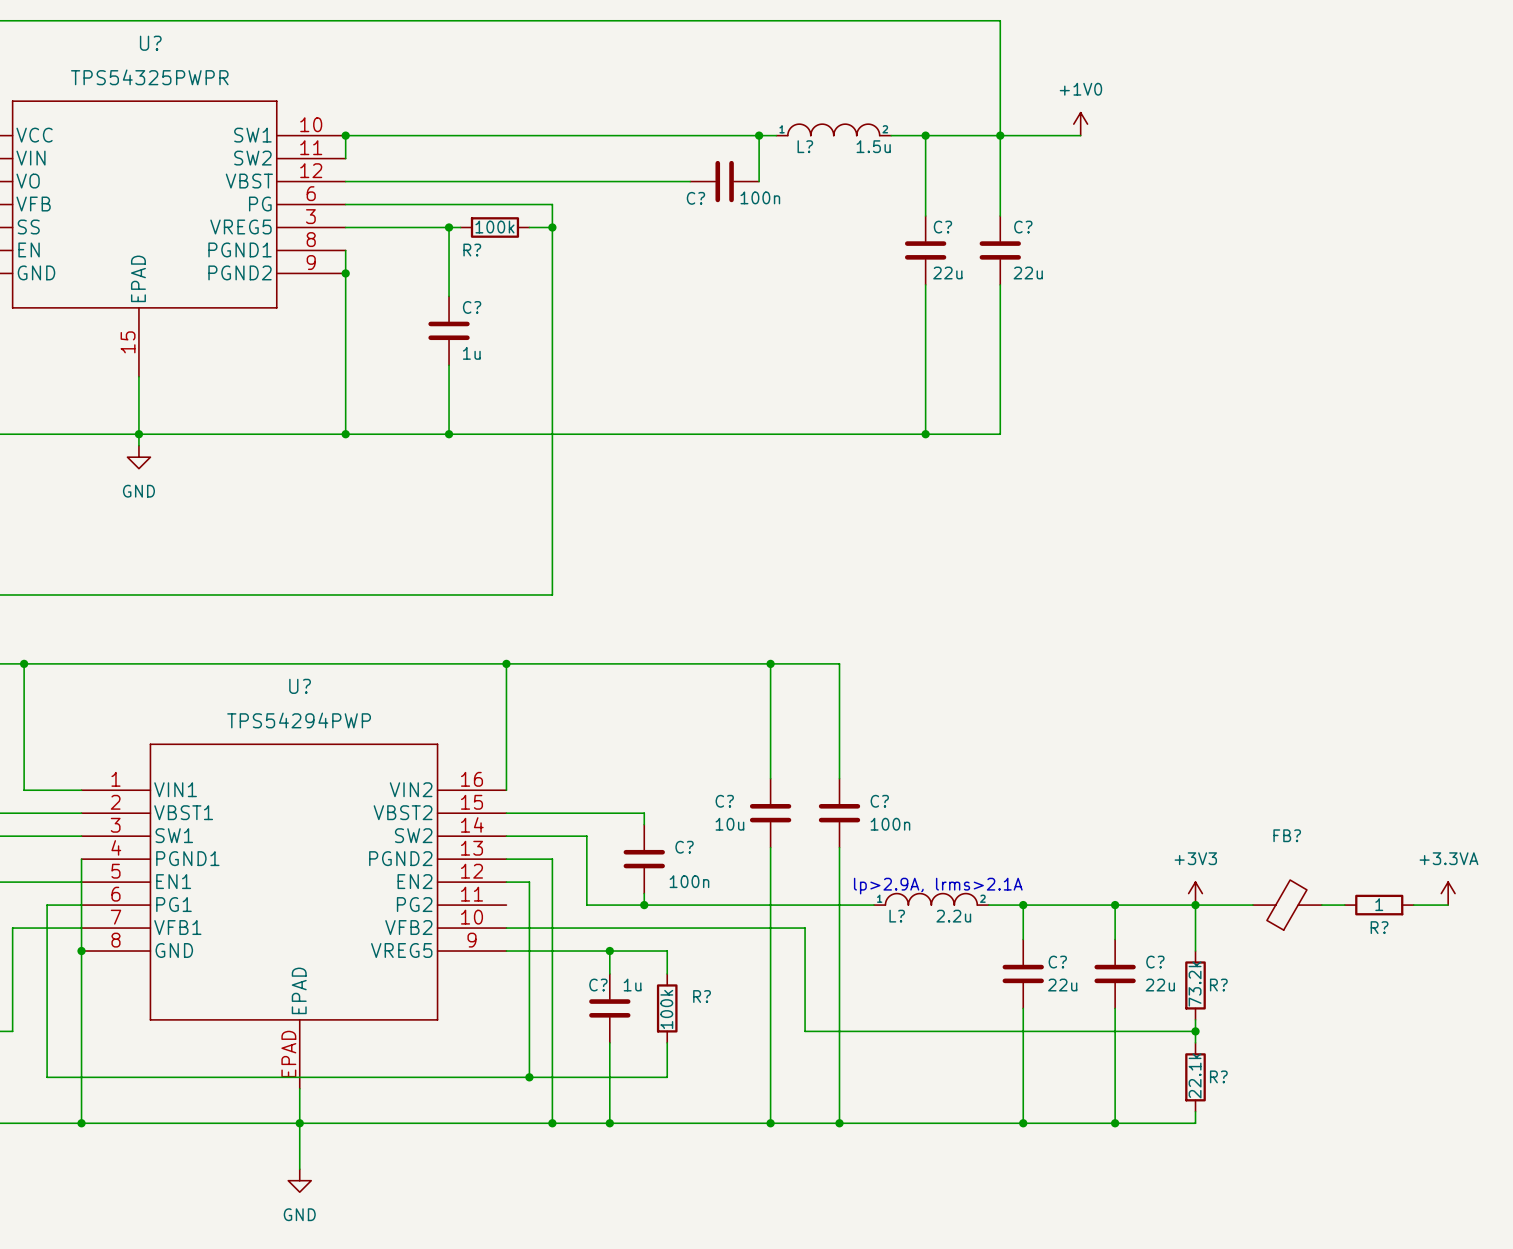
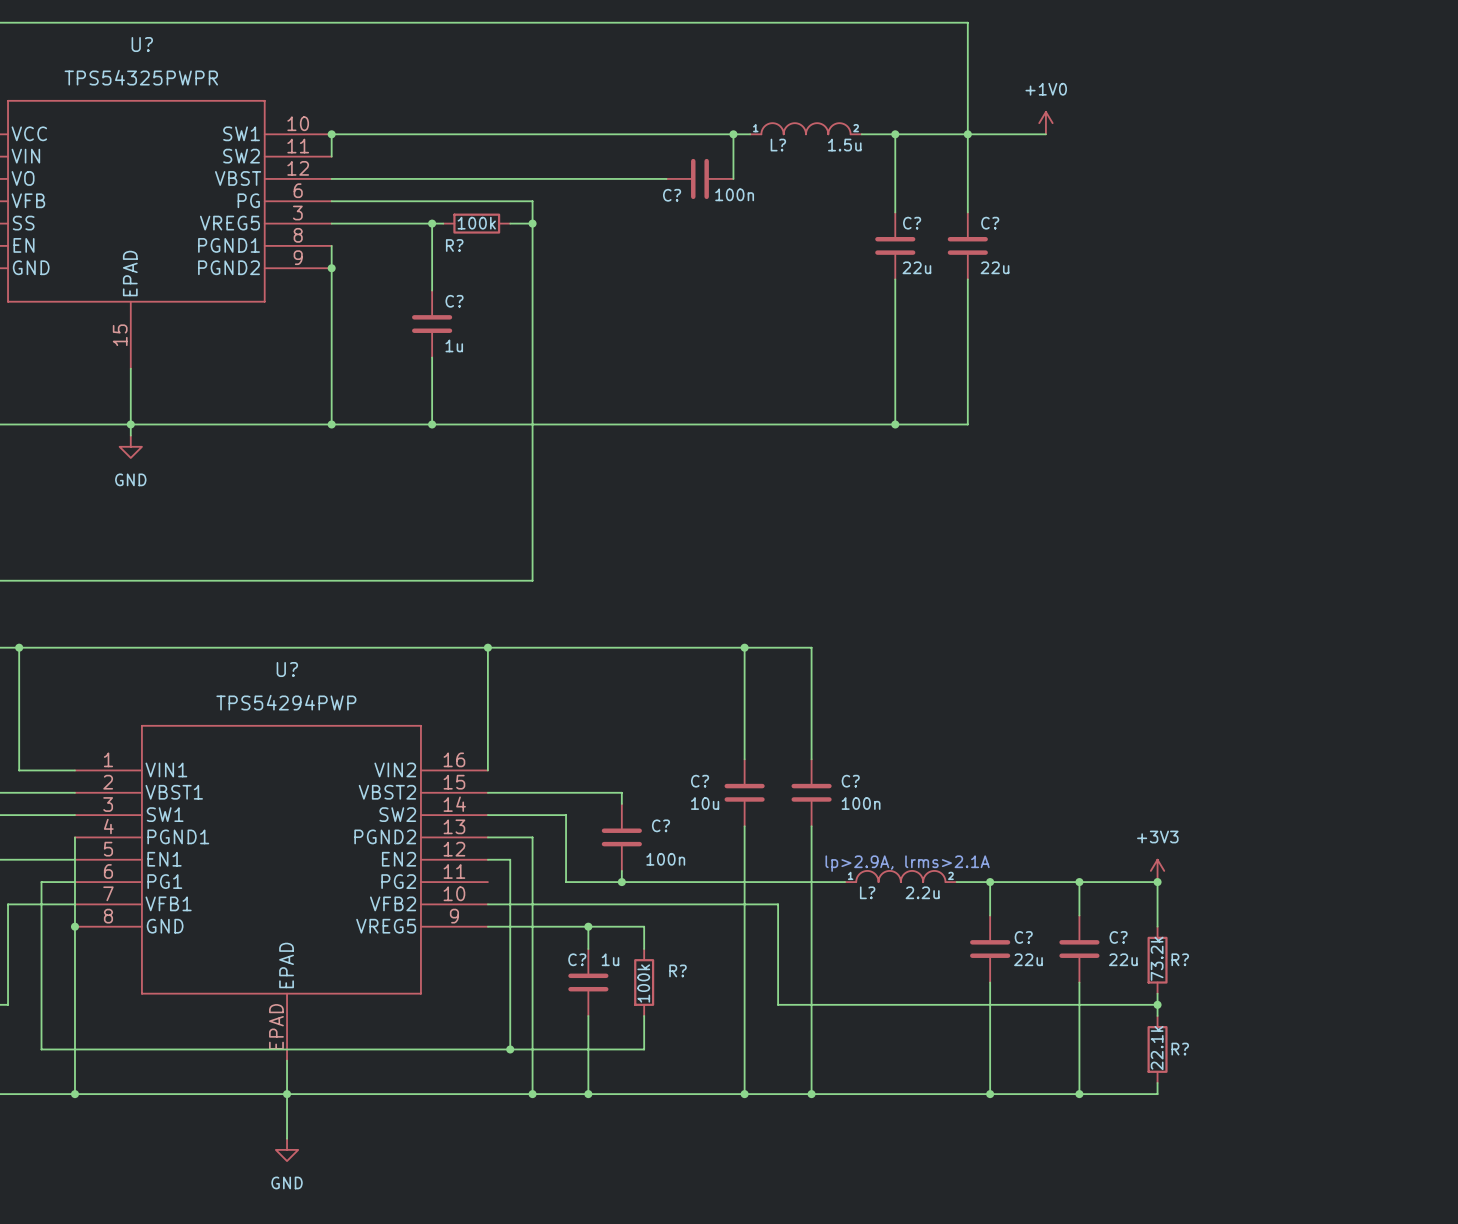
power symbol: +3.3VA (1448, 893) -> none
wire: (1195, 905) (1252, 905) -> none
FB?: (1287, 905) -> none
wire: (1321, 905) (1344, 905) -> none
R?: 1 (1379, 905) -> none
wire: (1413, 905) (1448, 905) -> none

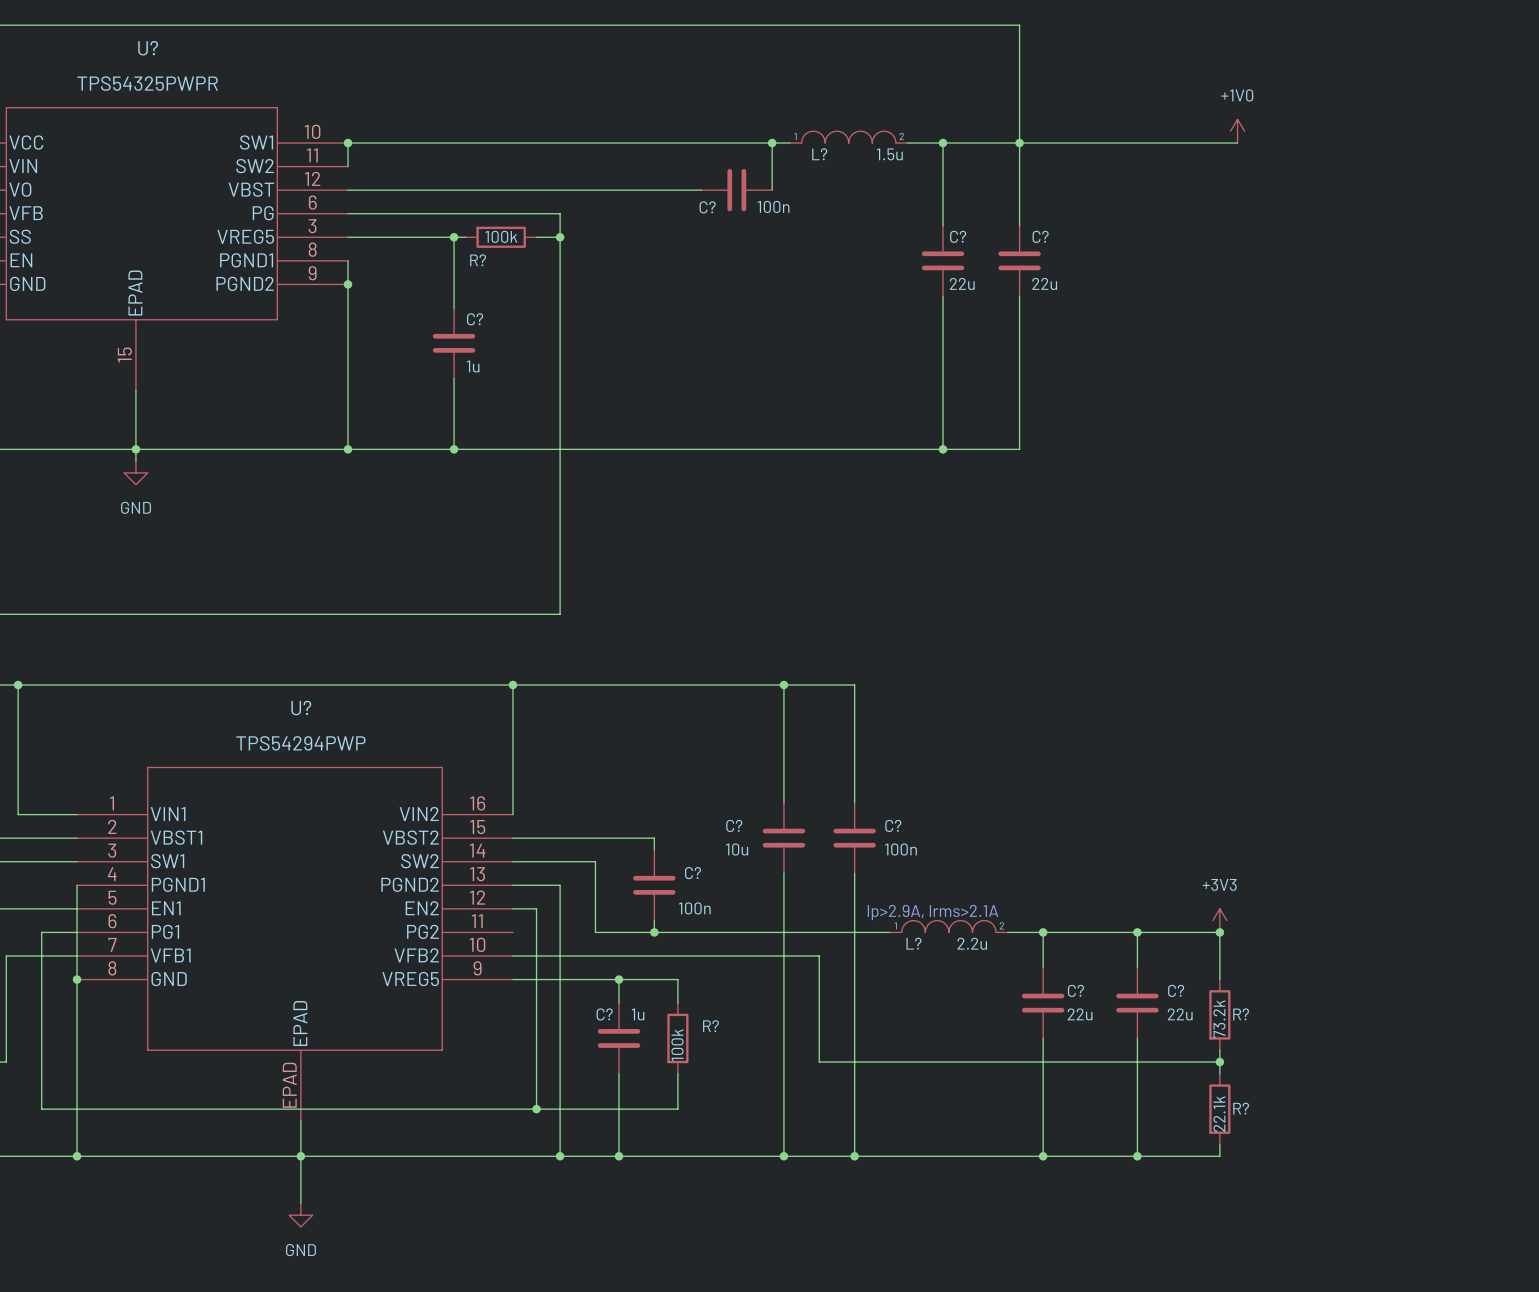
power symbol position: +1V0 (1045, 123) -> +1V0 (1237, 131)
wire: none -> (1102, 143) (1237, 143)

